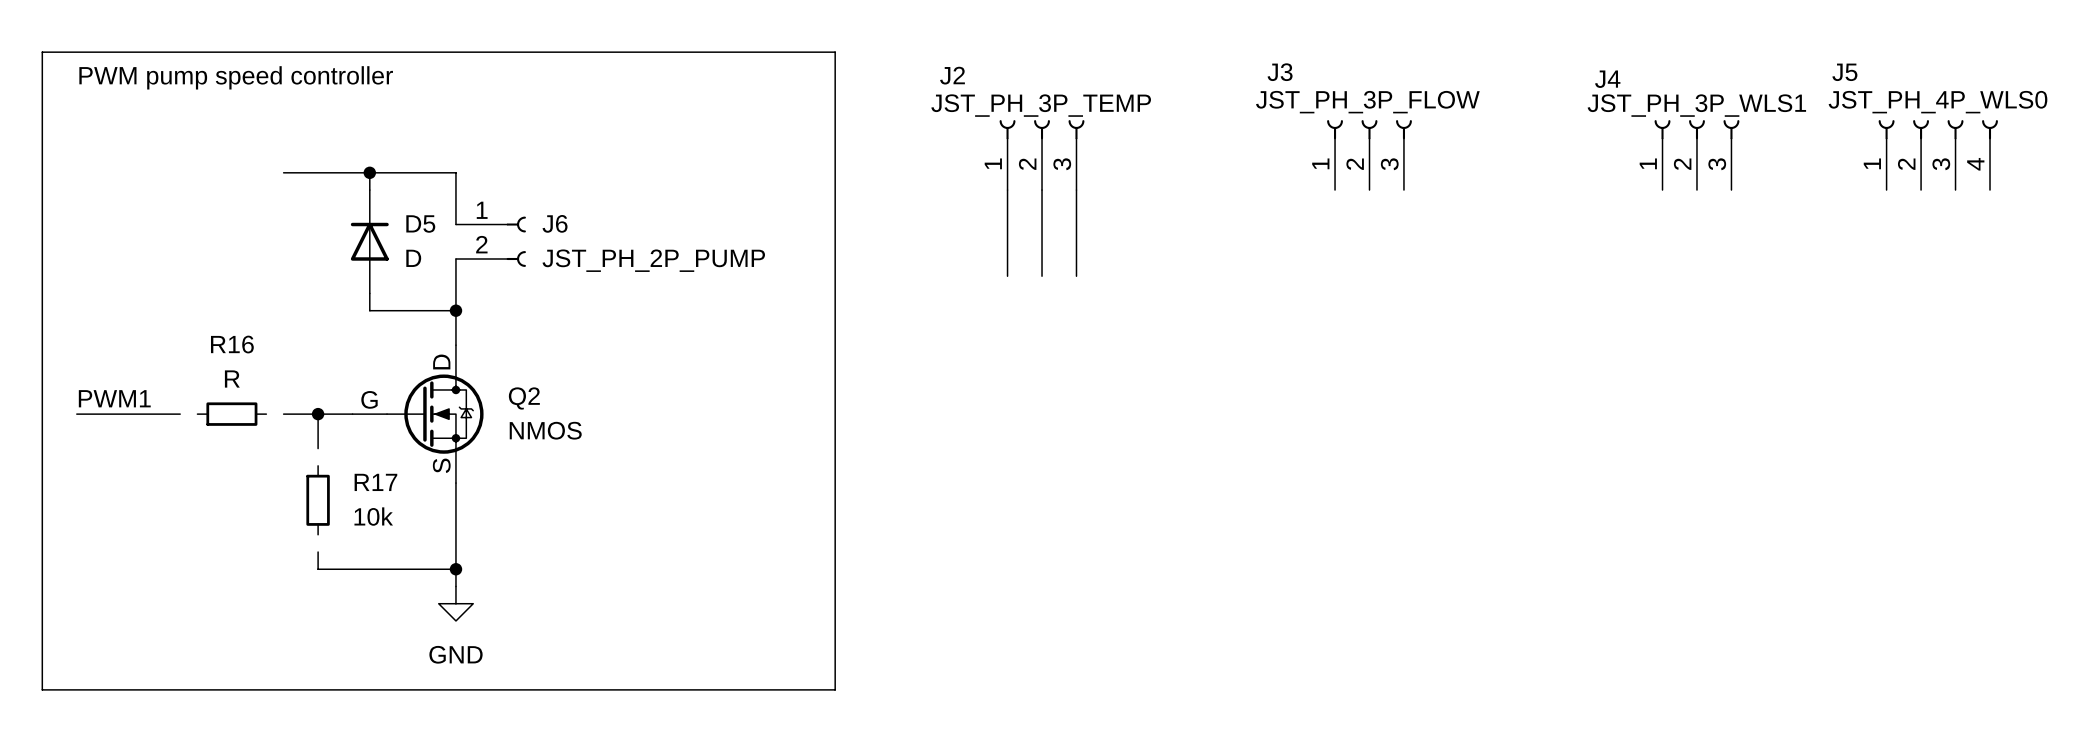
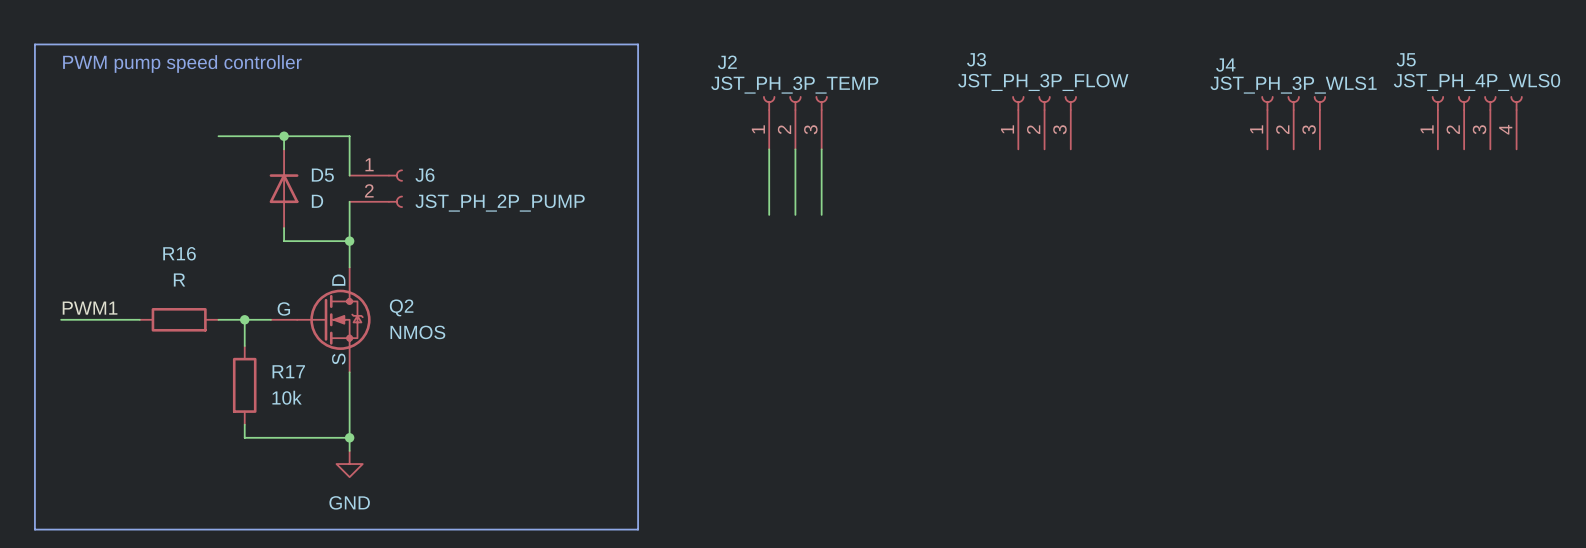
R16 symbol: [197, 402, 267, 426] -> [139, 308, 219, 332]
R17 symbol: [306, 465, 330, 535] -> [232, 346, 257, 425]

